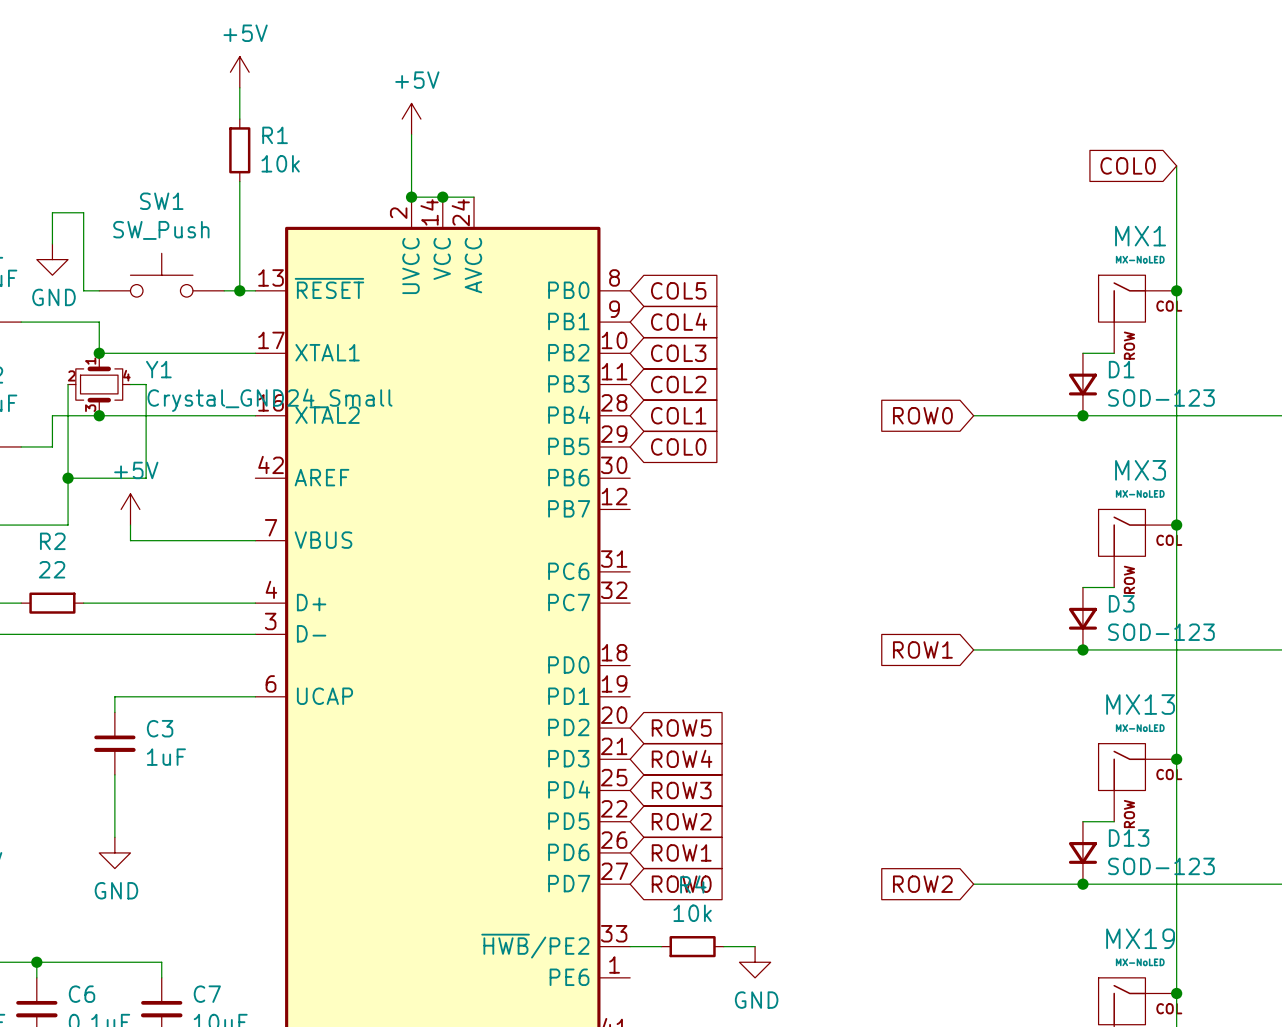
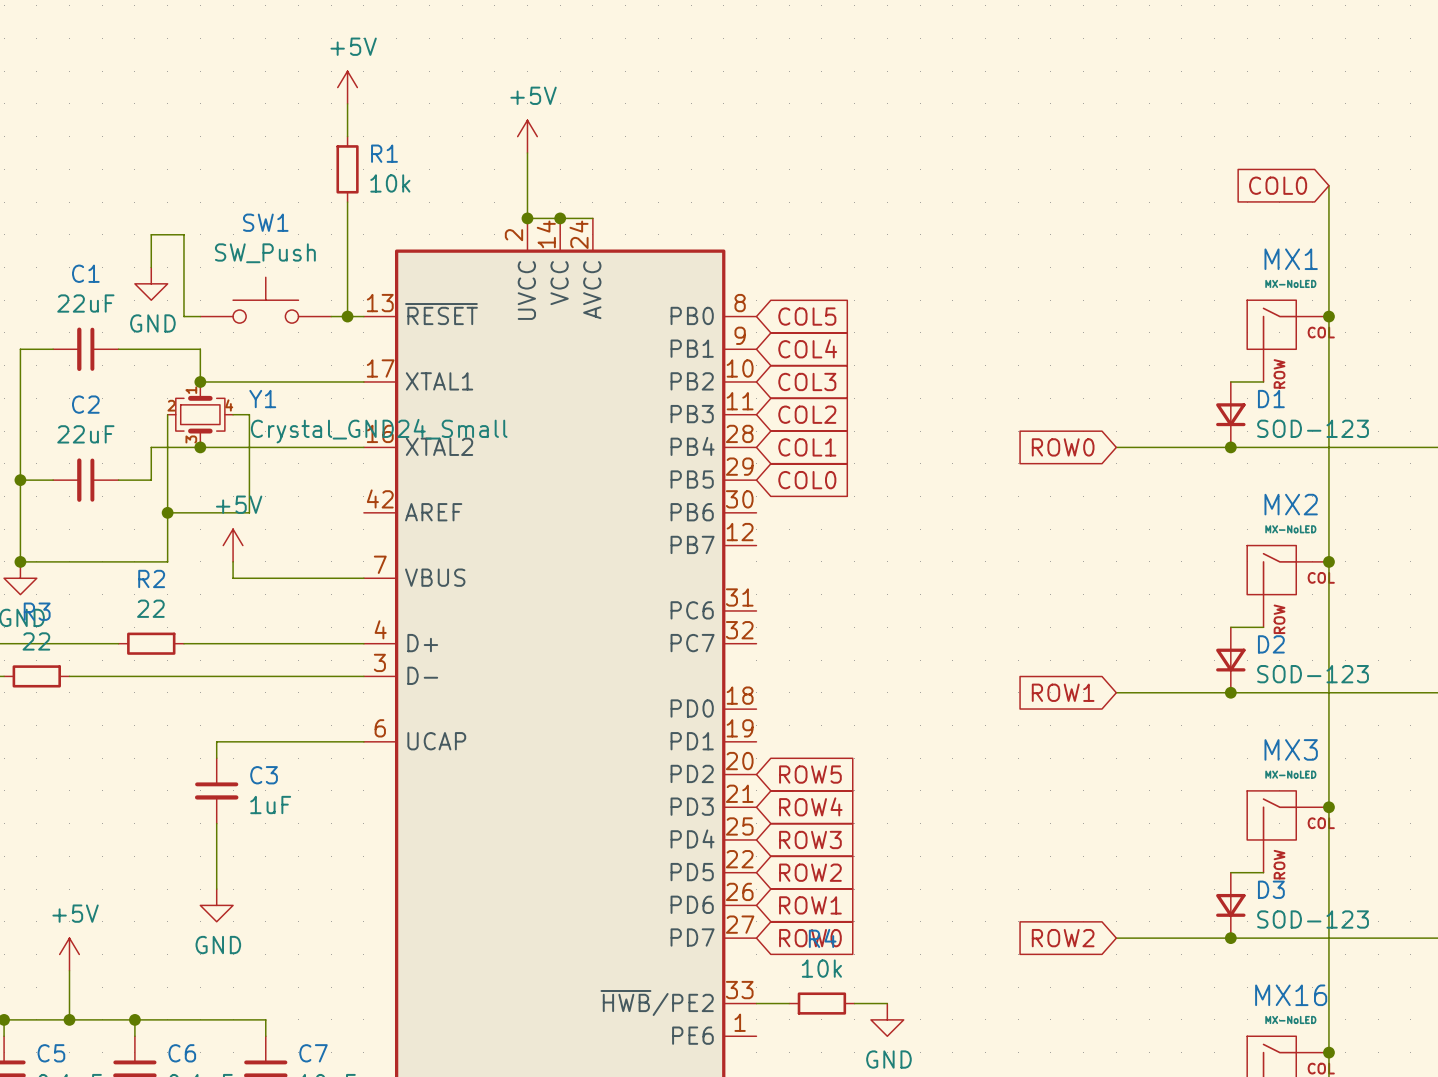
MX3 name: MX3 (1140, 470) -> MX2 (1291, 504)
D3 name: D3 (1121, 603) -> D2 (1271, 644)
MX13 name: MX13 (1140, 704) -> MX3 (1291, 749)
D13 name: D13 (1129, 838) -> D3 (1271, 889)
MX19 name: MX19 (1140, 938) -> MX16 (1291, 995)

